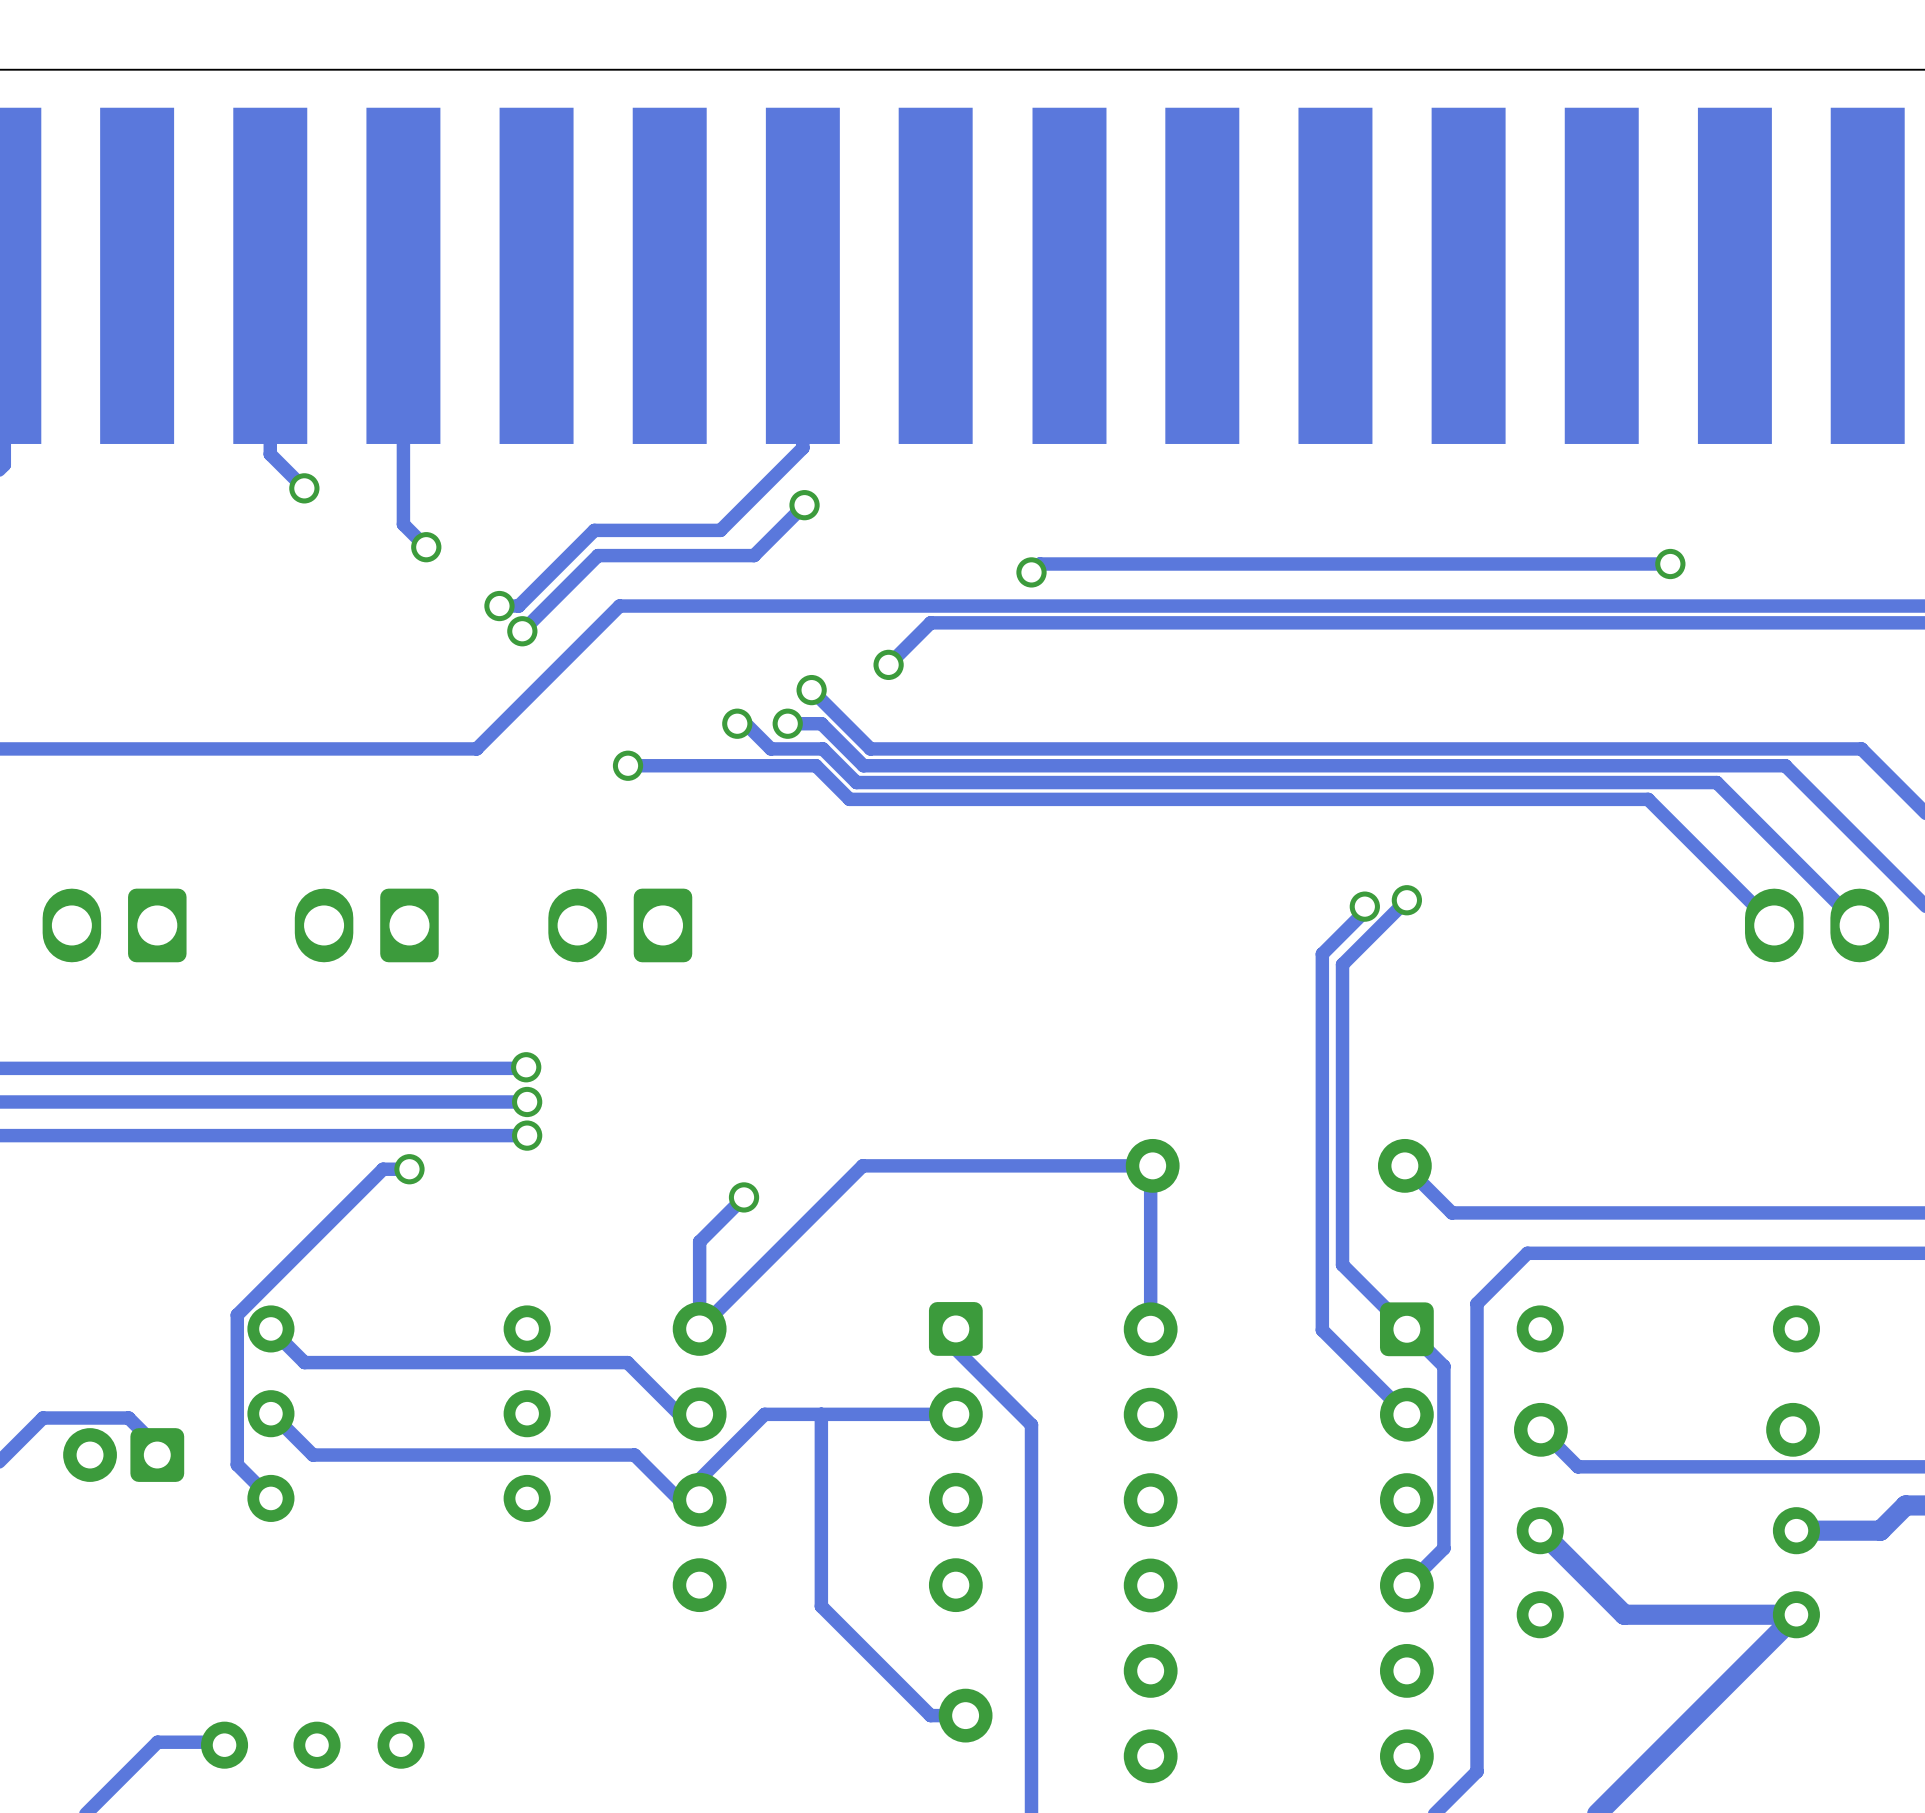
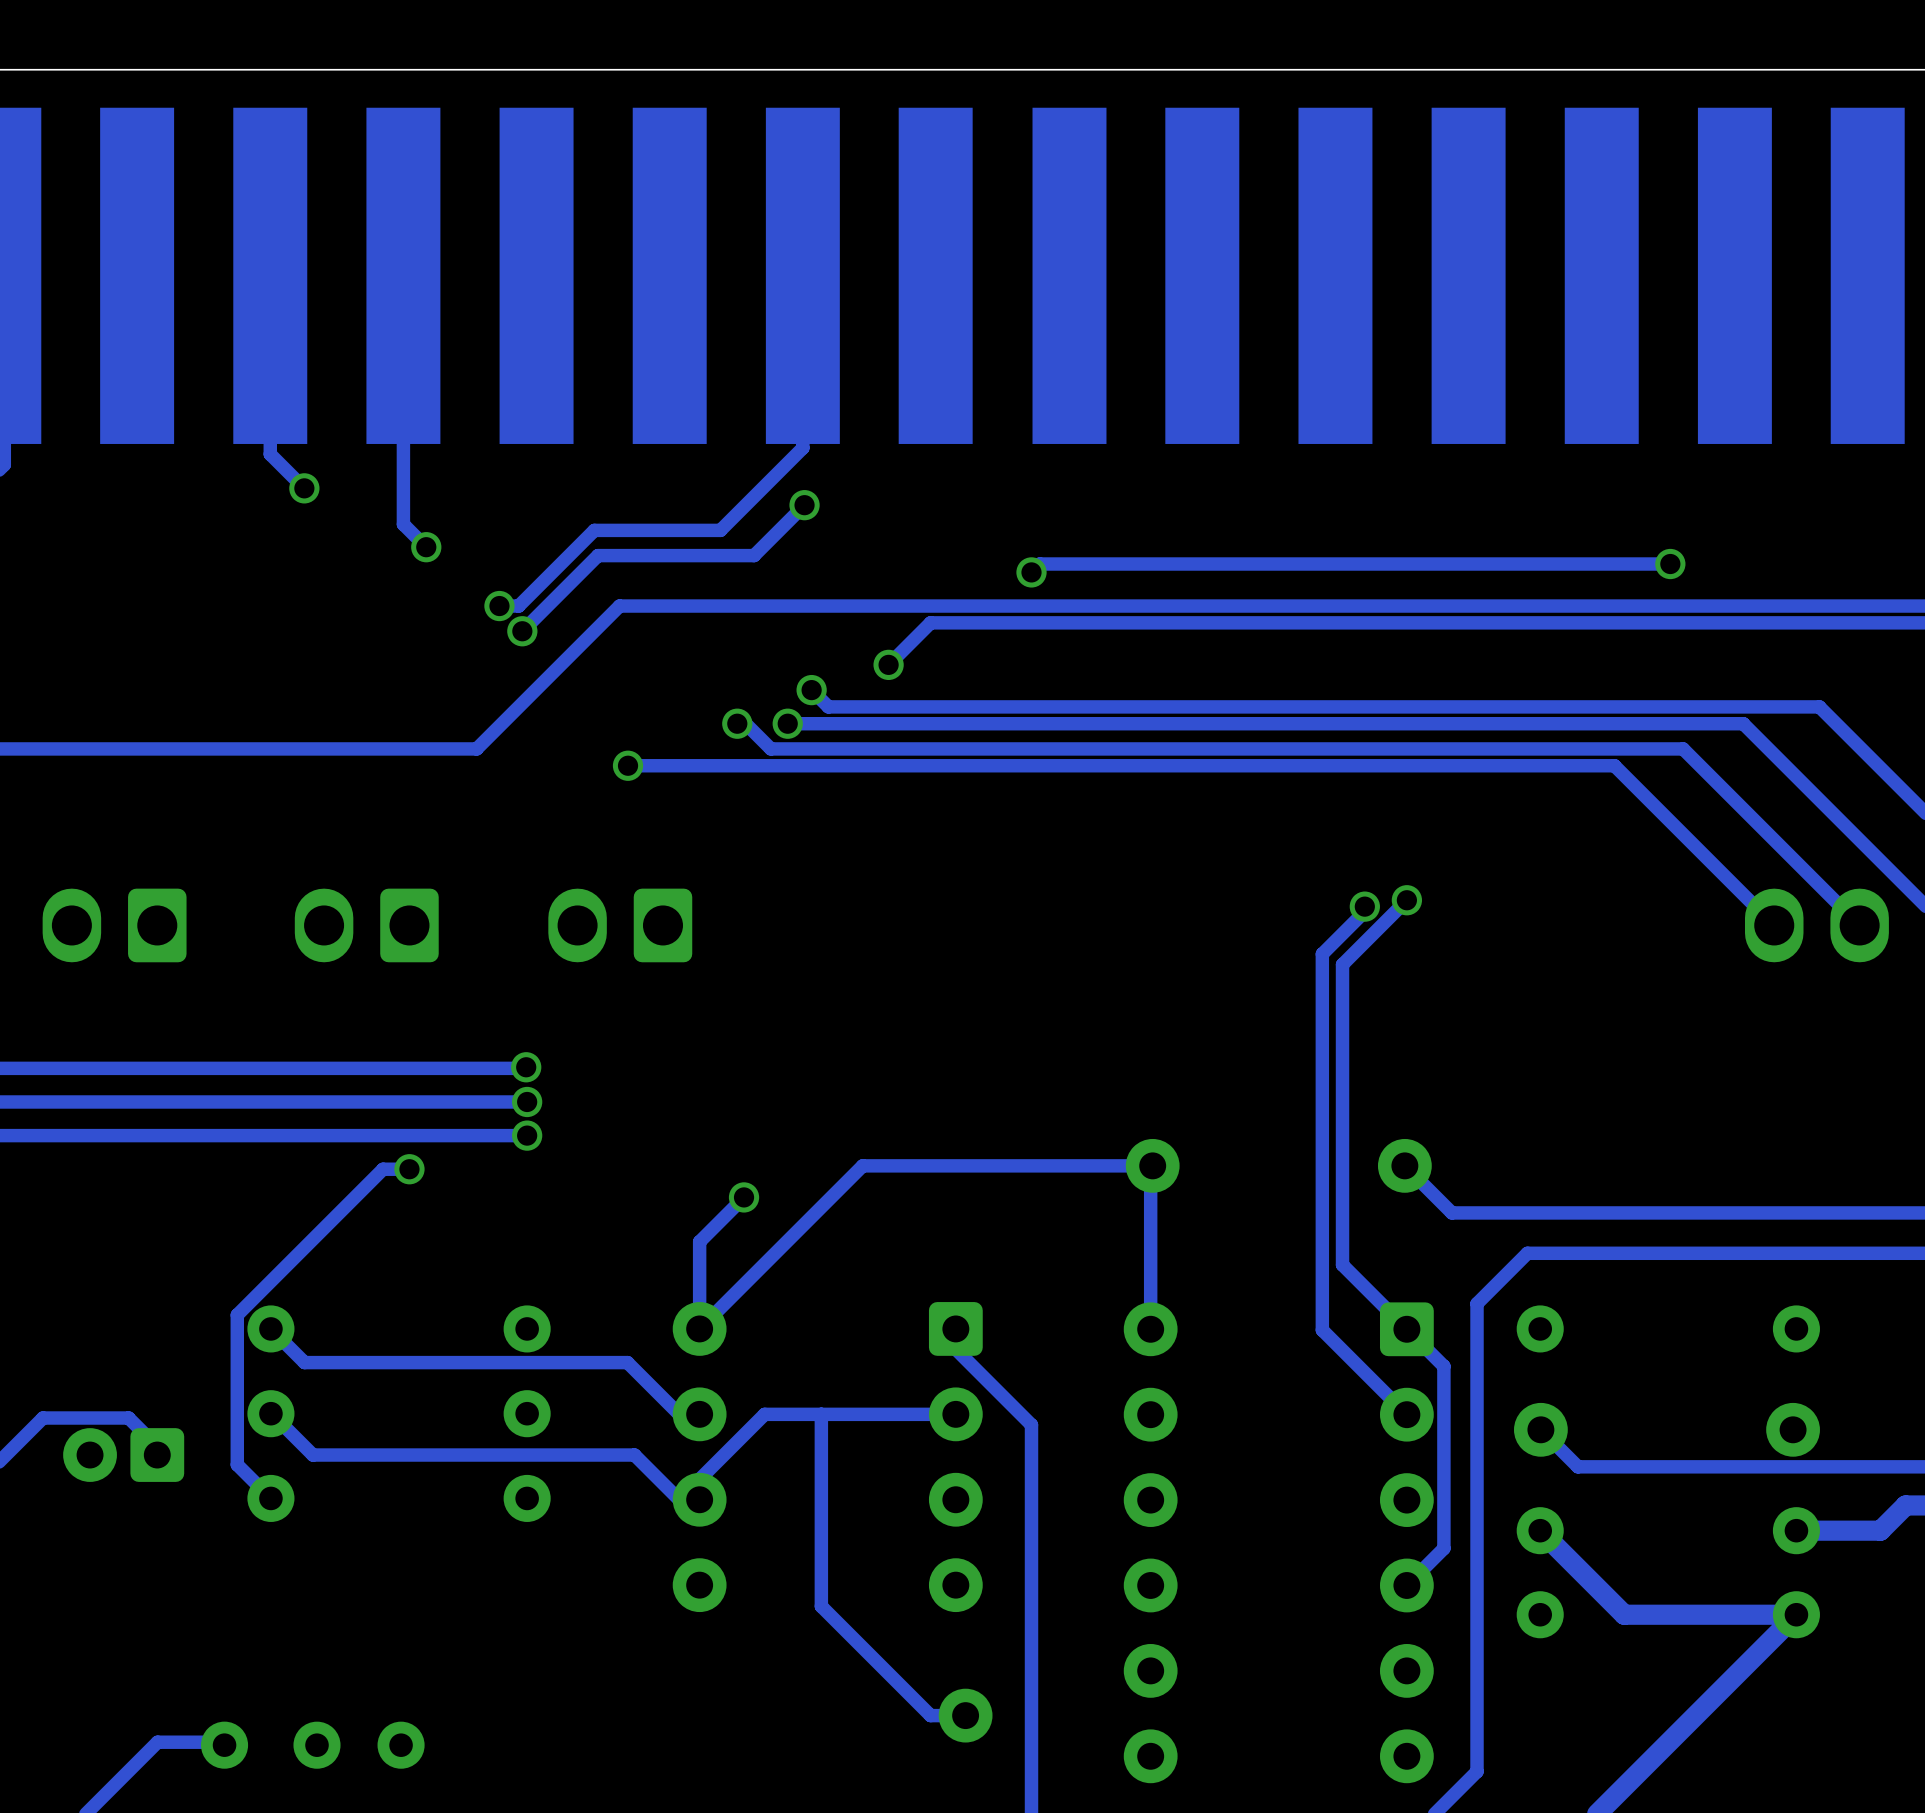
track: (828, 706) (870, 748) -> (822, 748) (870, 748)
track: none -> (828, 706) (1819, 706) (1861, 748)
track: (821, 723) (863, 765) -> (815, 765) (863, 765)
track: none -> (821, 723) (1743, 723) (1785, 765)
track: (822, 748) (856, 782) (1716, 782) -> none
track: (1861, 748) (1683, 748) -> (1716, 782) (1683, 748)
track: (815, 765) (849, 799) (1648, 799) -> none
track: (1785, 765) (1614, 765) -> (1648, 799) (1614, 765)

